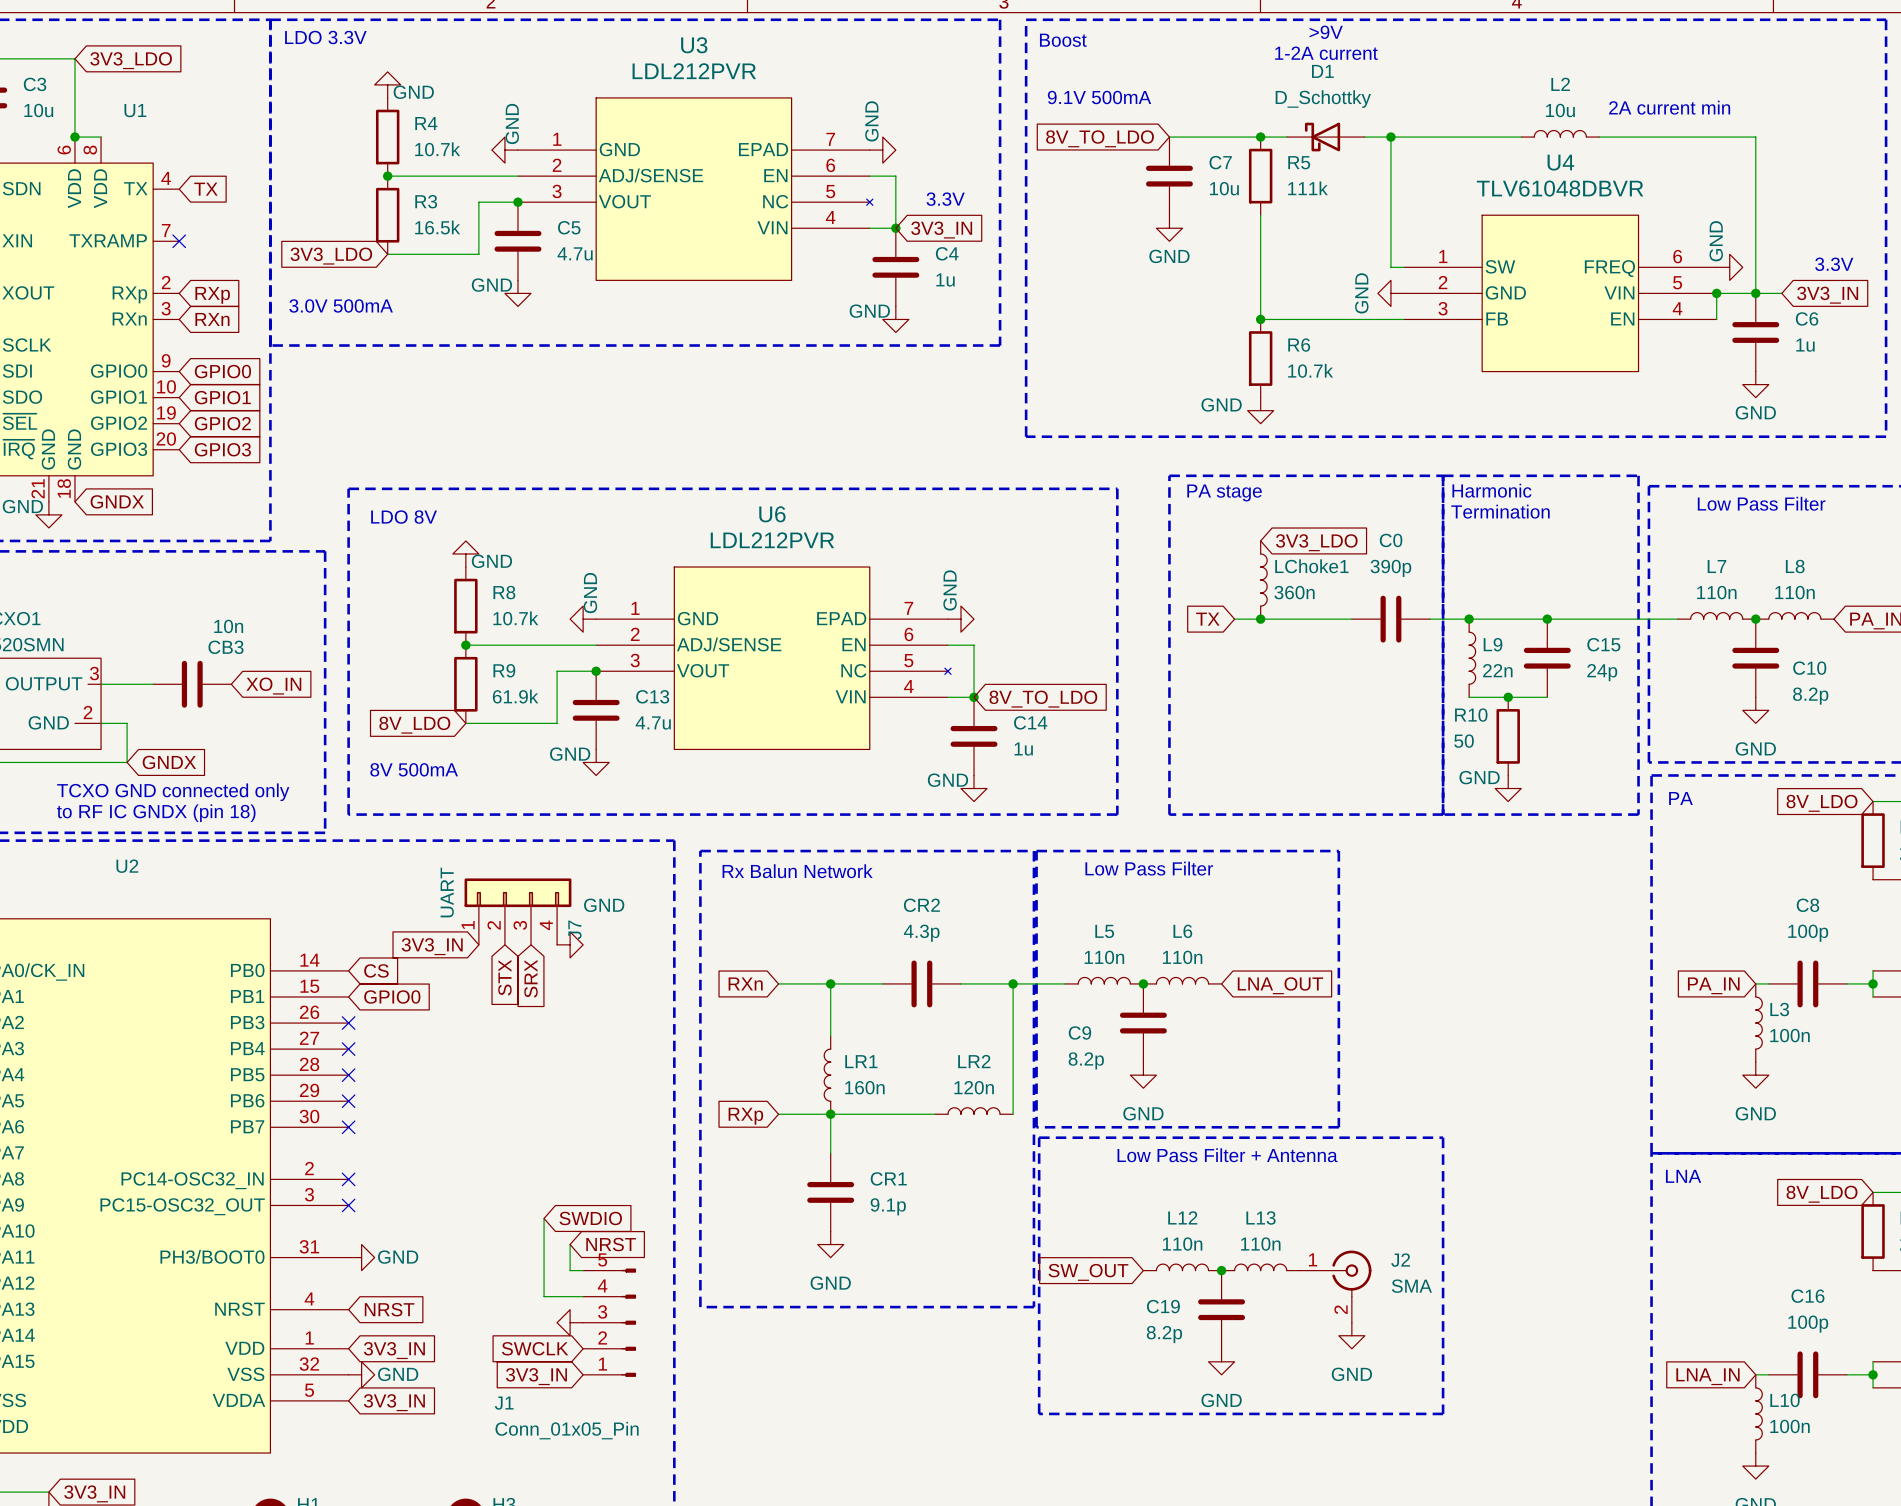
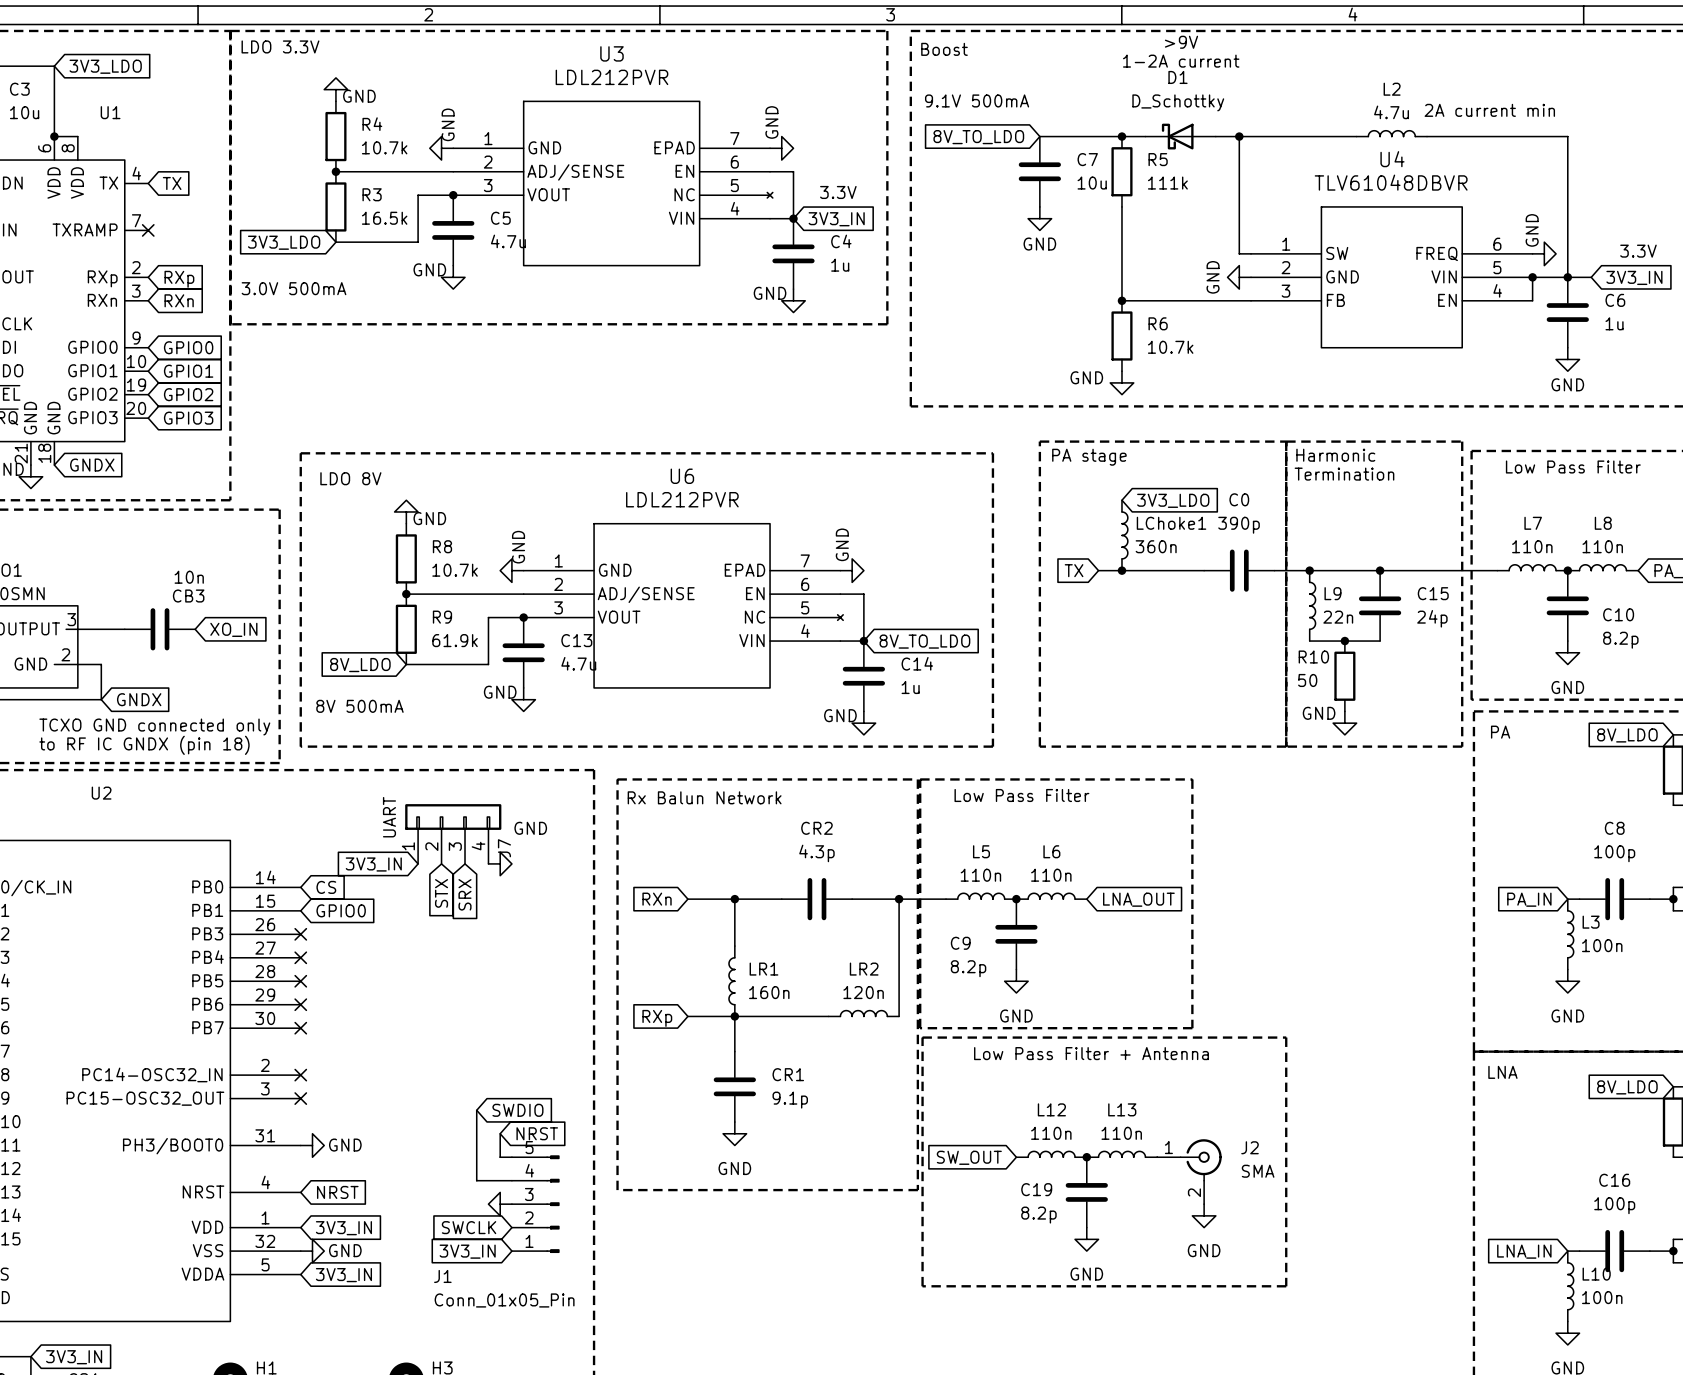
L2 value: 10u (1560, 110) -> 4.7u (1391, 112)

